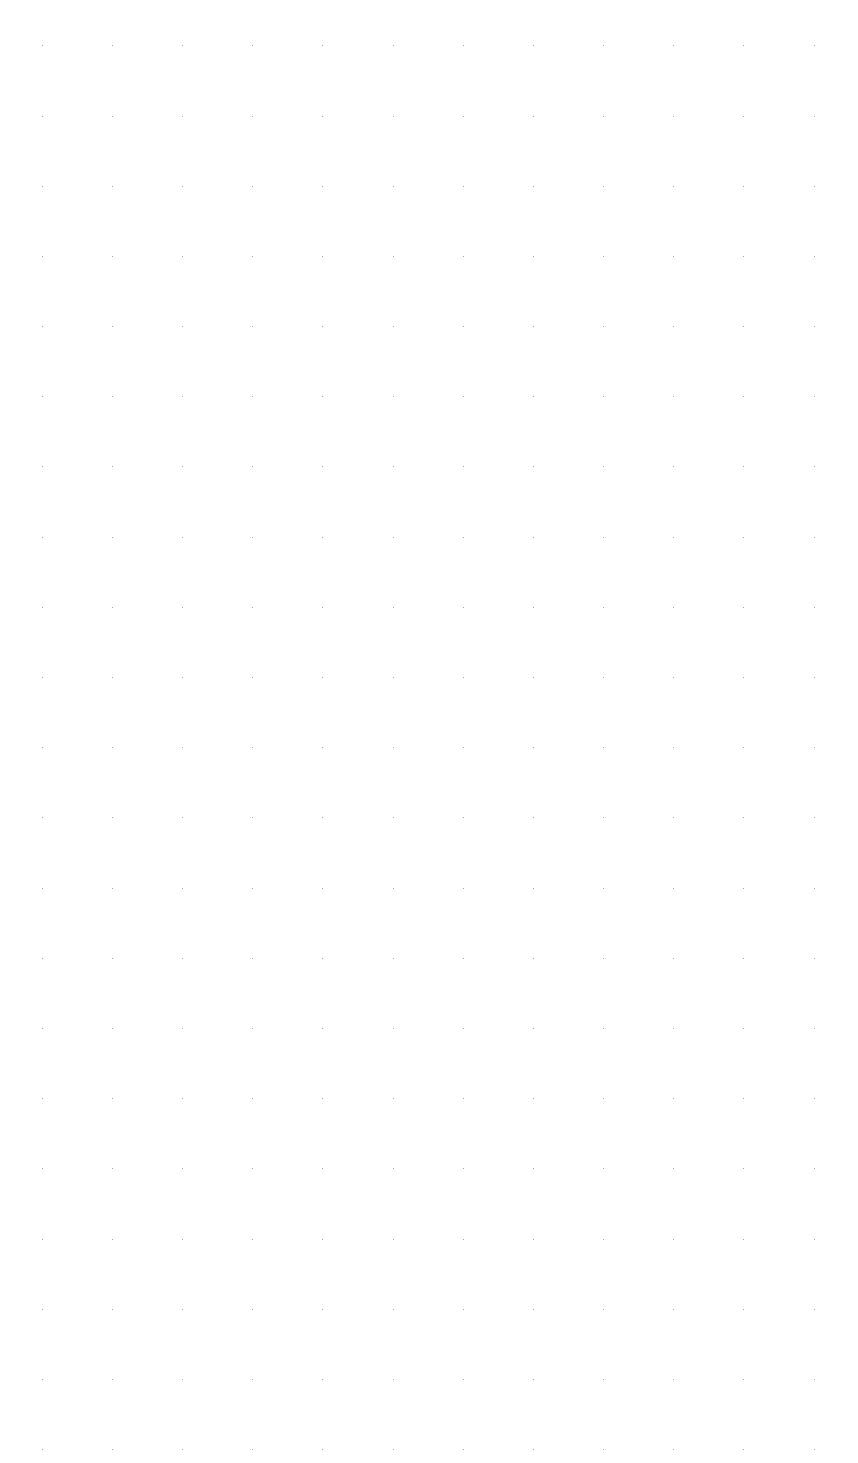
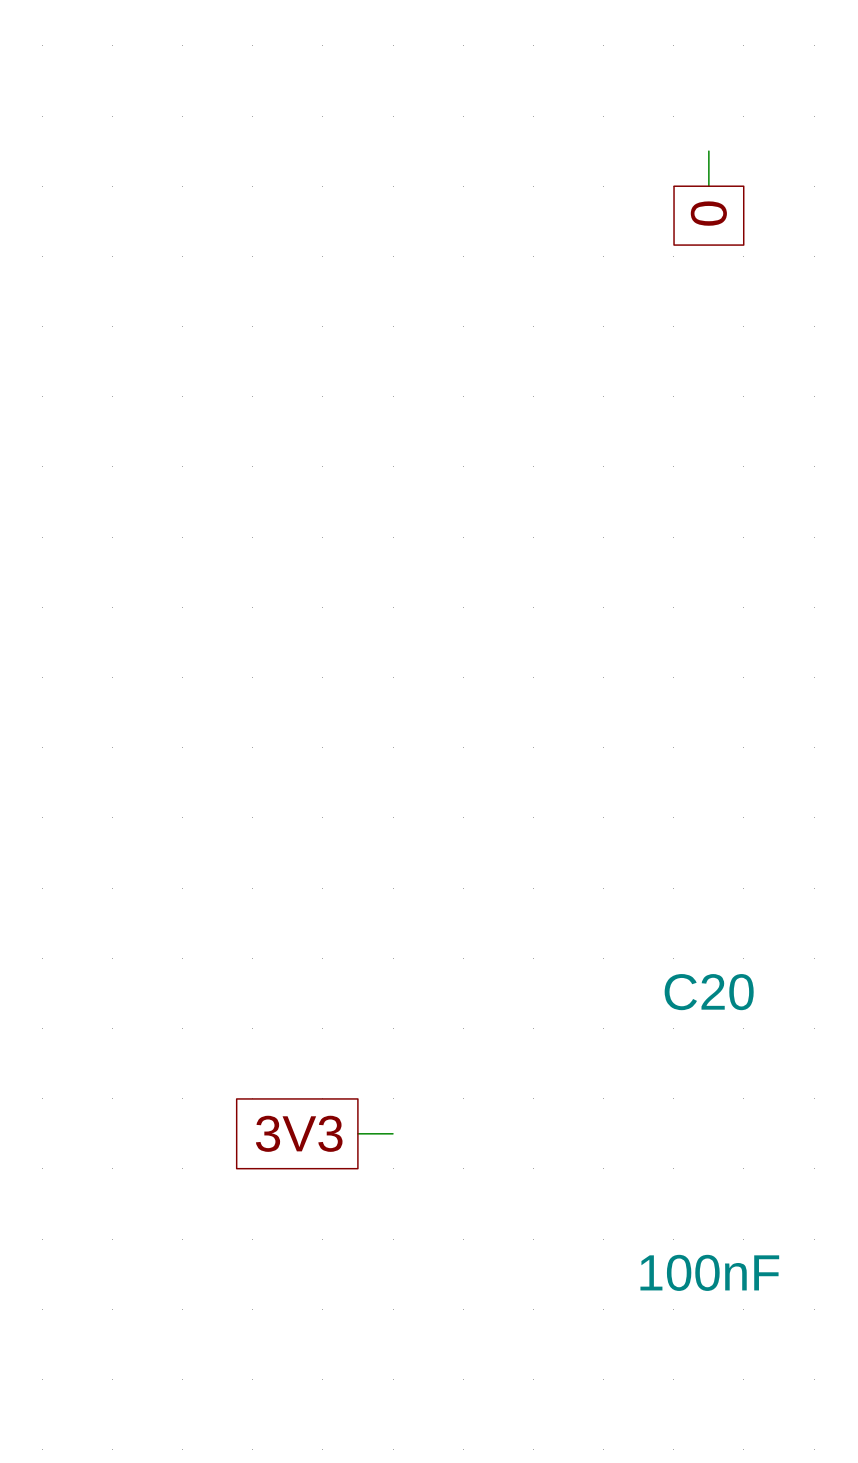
wire: none -> (708, 151) (708, 186)
global label: none -> 0 (708, 213)
C20: none -> 100nF (709, 1132)
global label: none -> 3V3 (299, 1133)
wire: none -> (357, 1133) (393, 1133)

